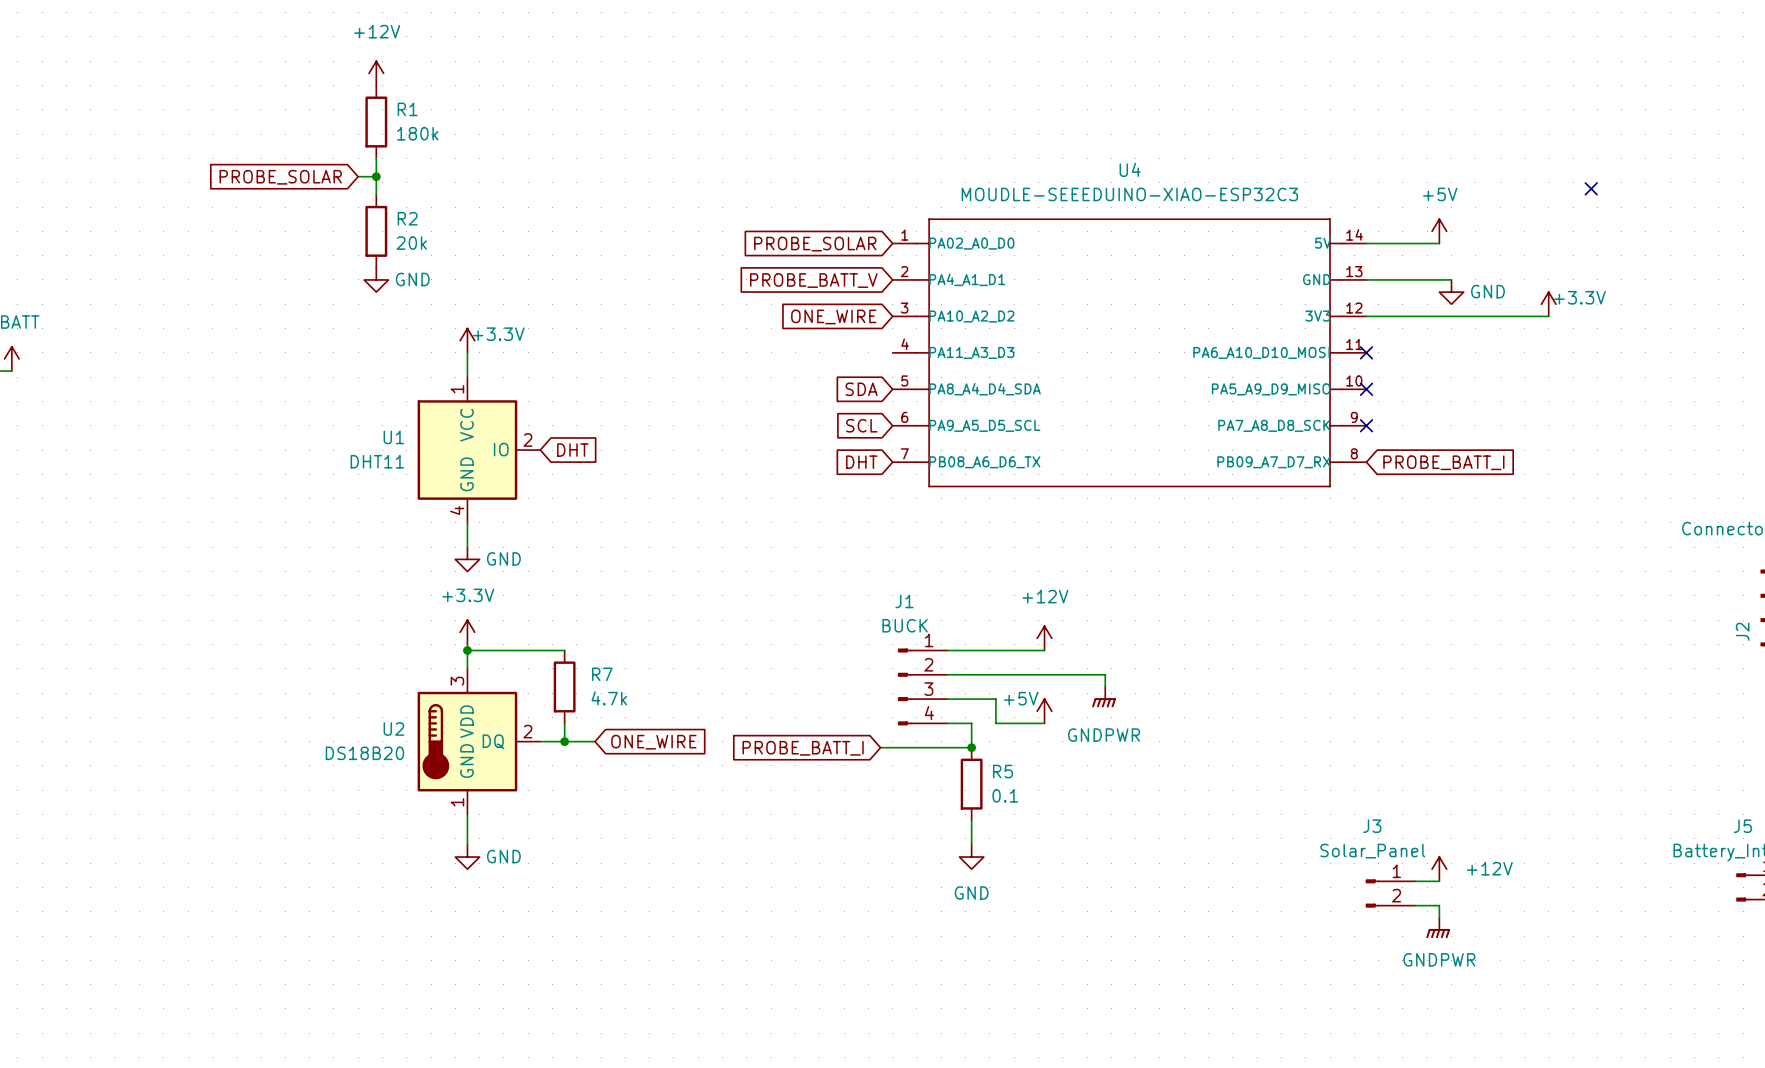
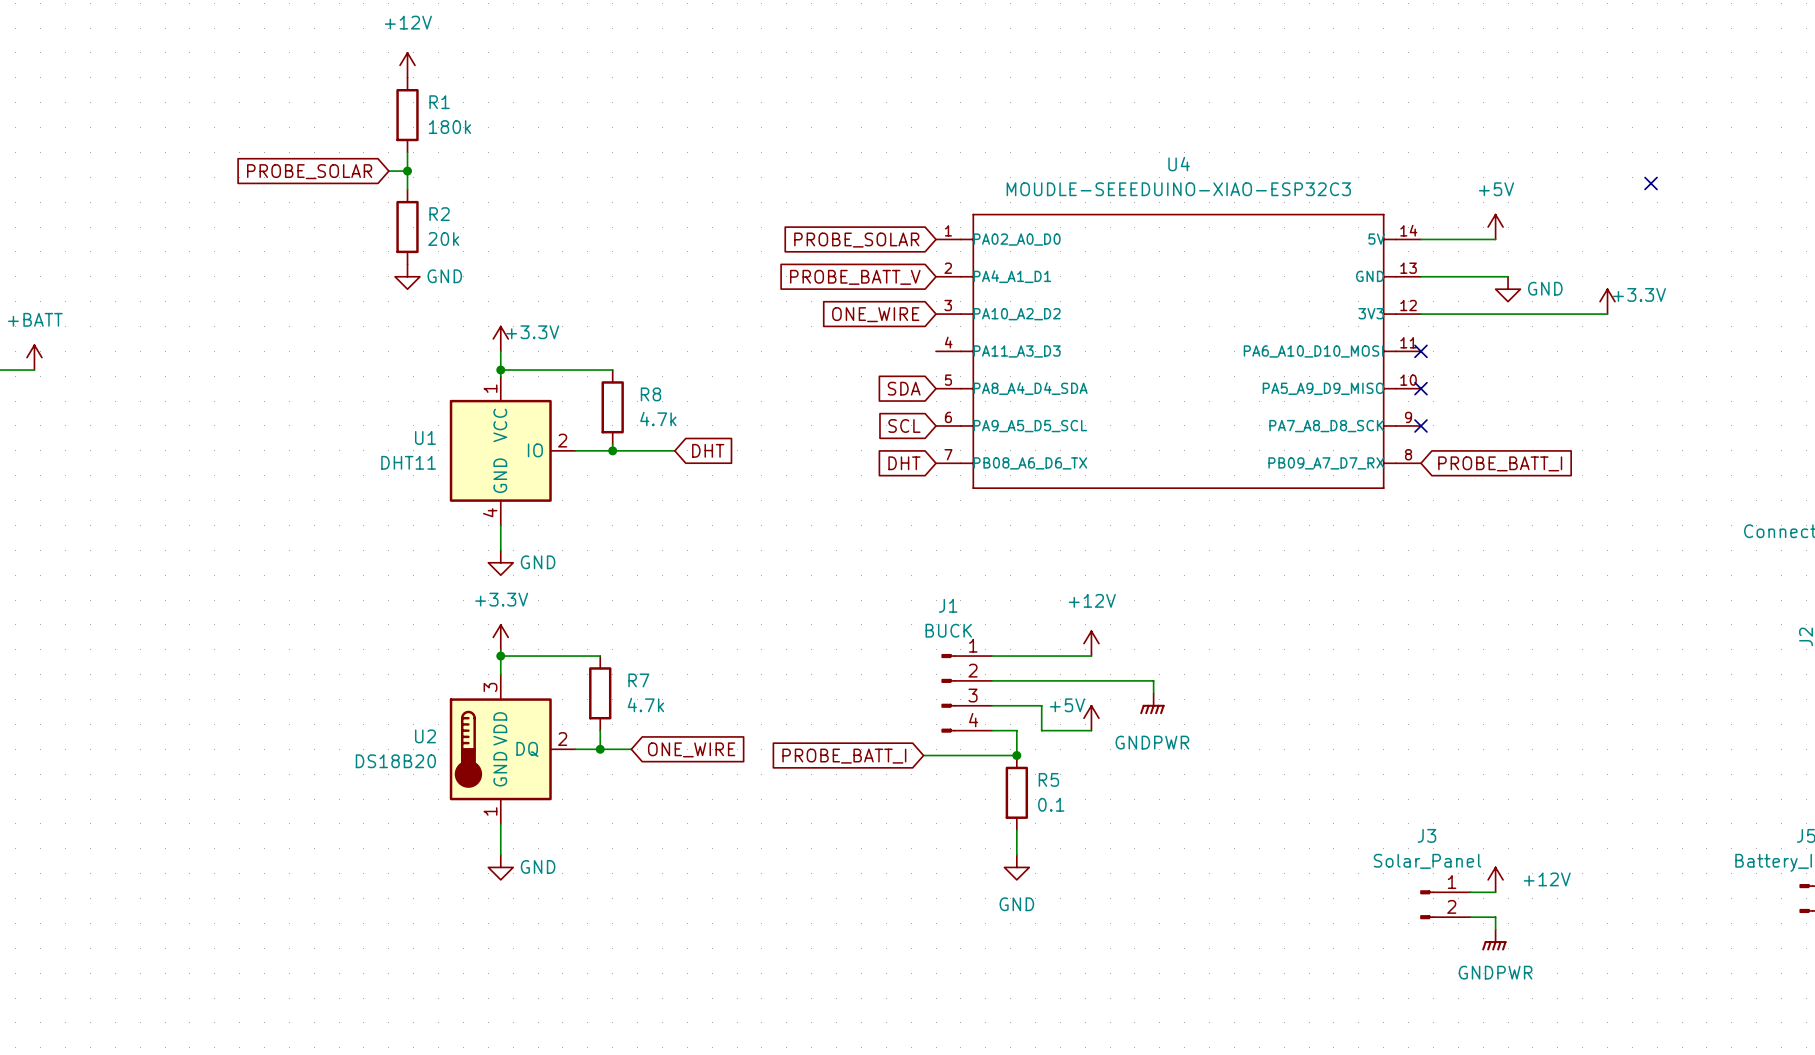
wire: none -> (500, 370) (612, 370)
junction: none -> (500, 370)
R8: none -> 4.7k (612, 407)
wire: none -> (575, 450) (674, 450)
global label position: DHT (572, 450) -> DHT (708, 450)
junction: none -> (612, 450)

